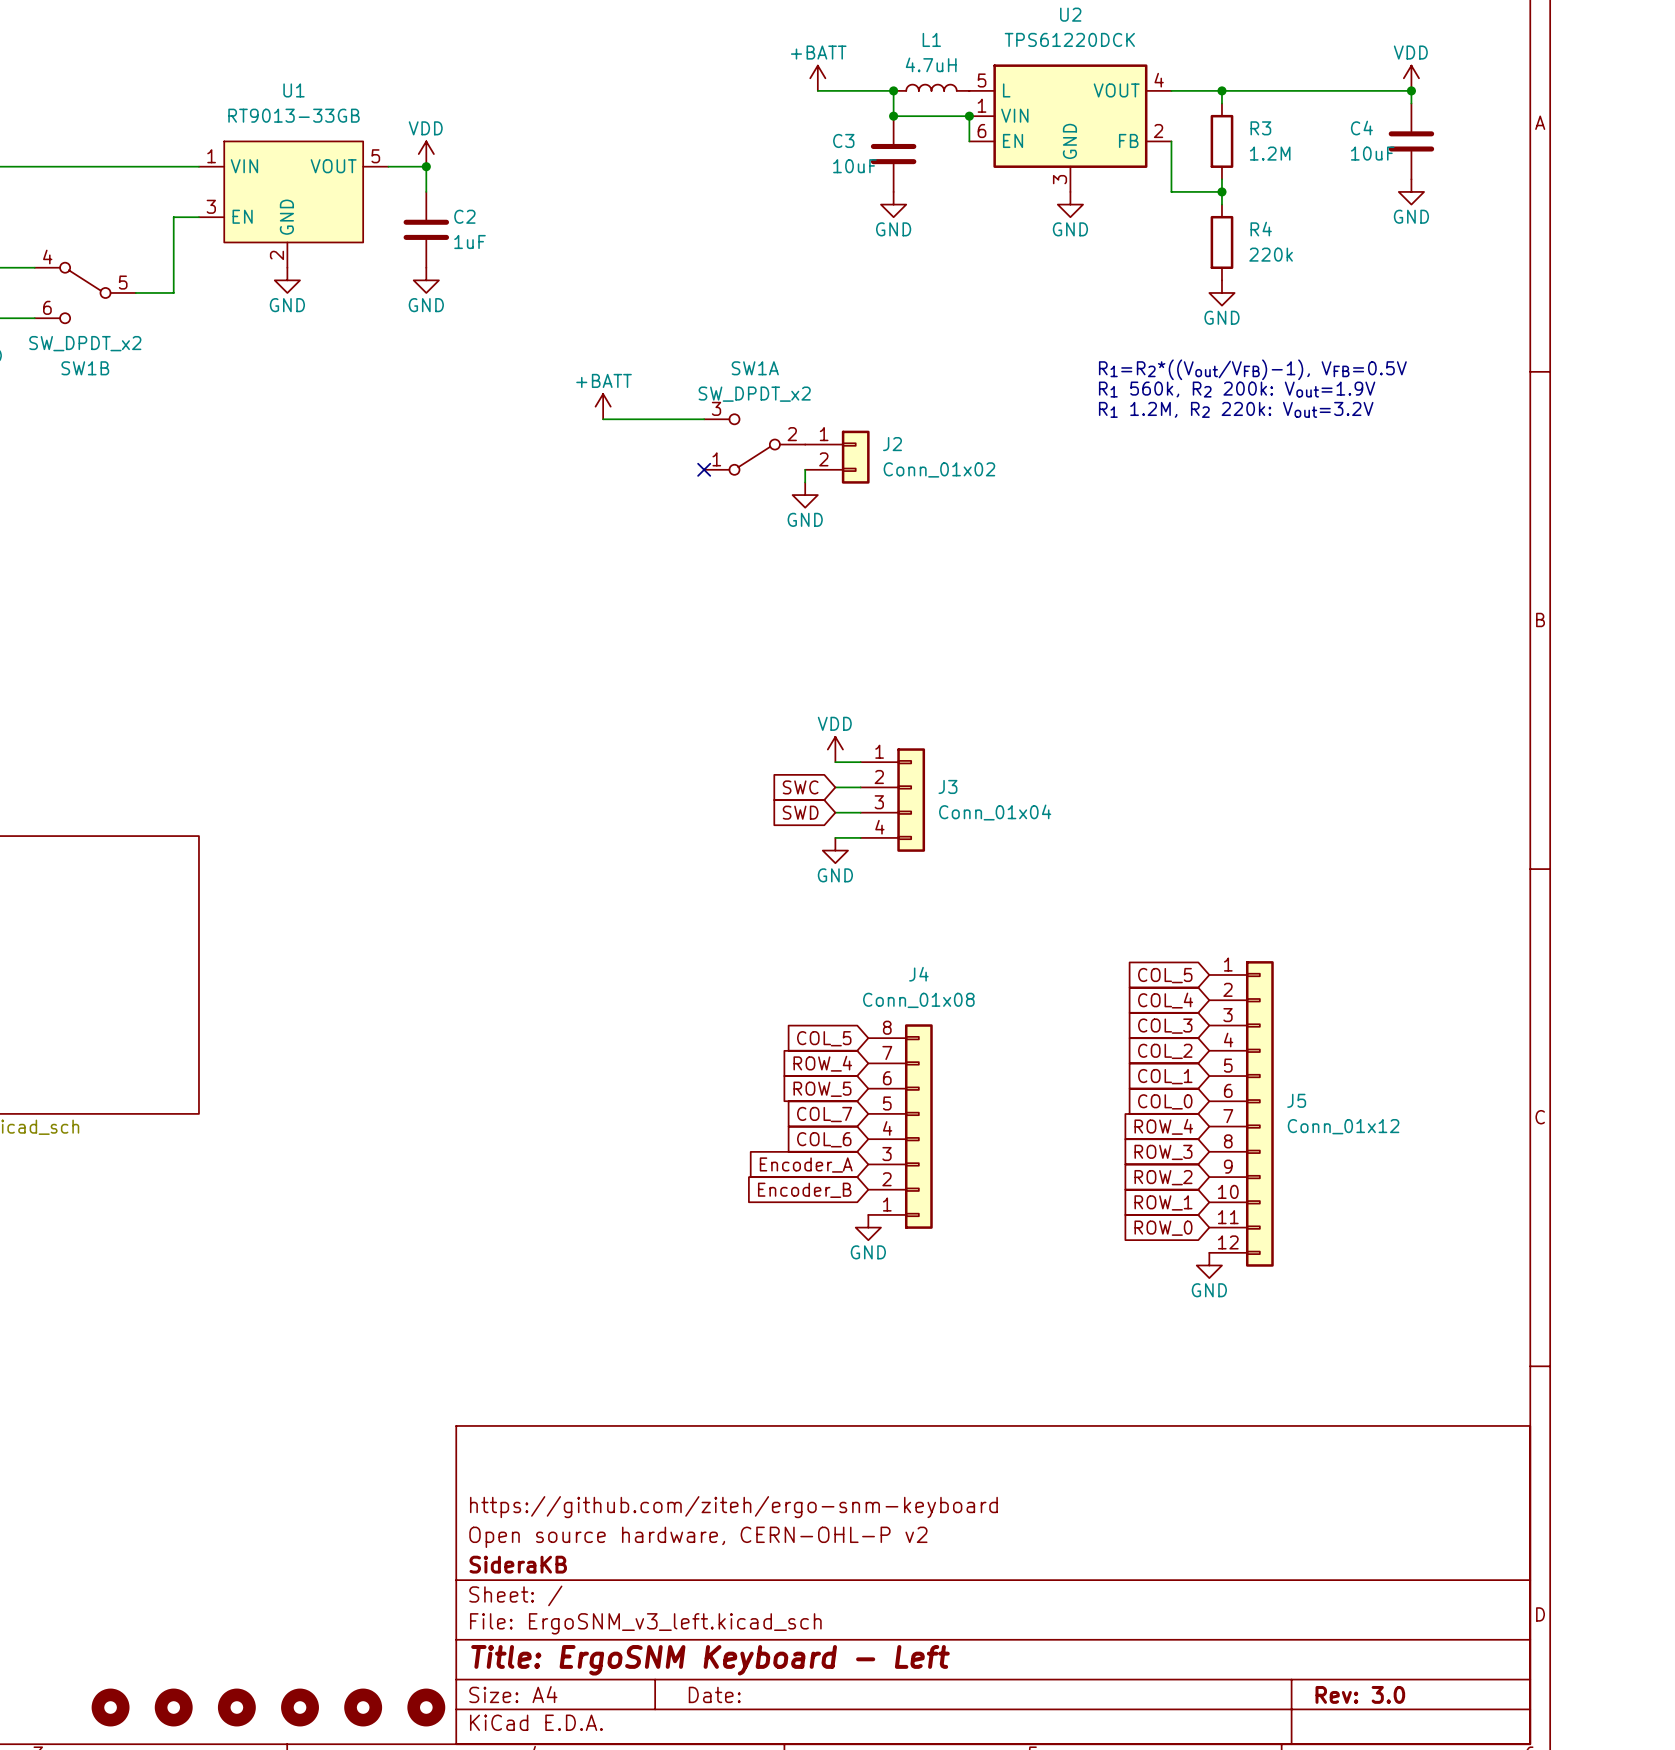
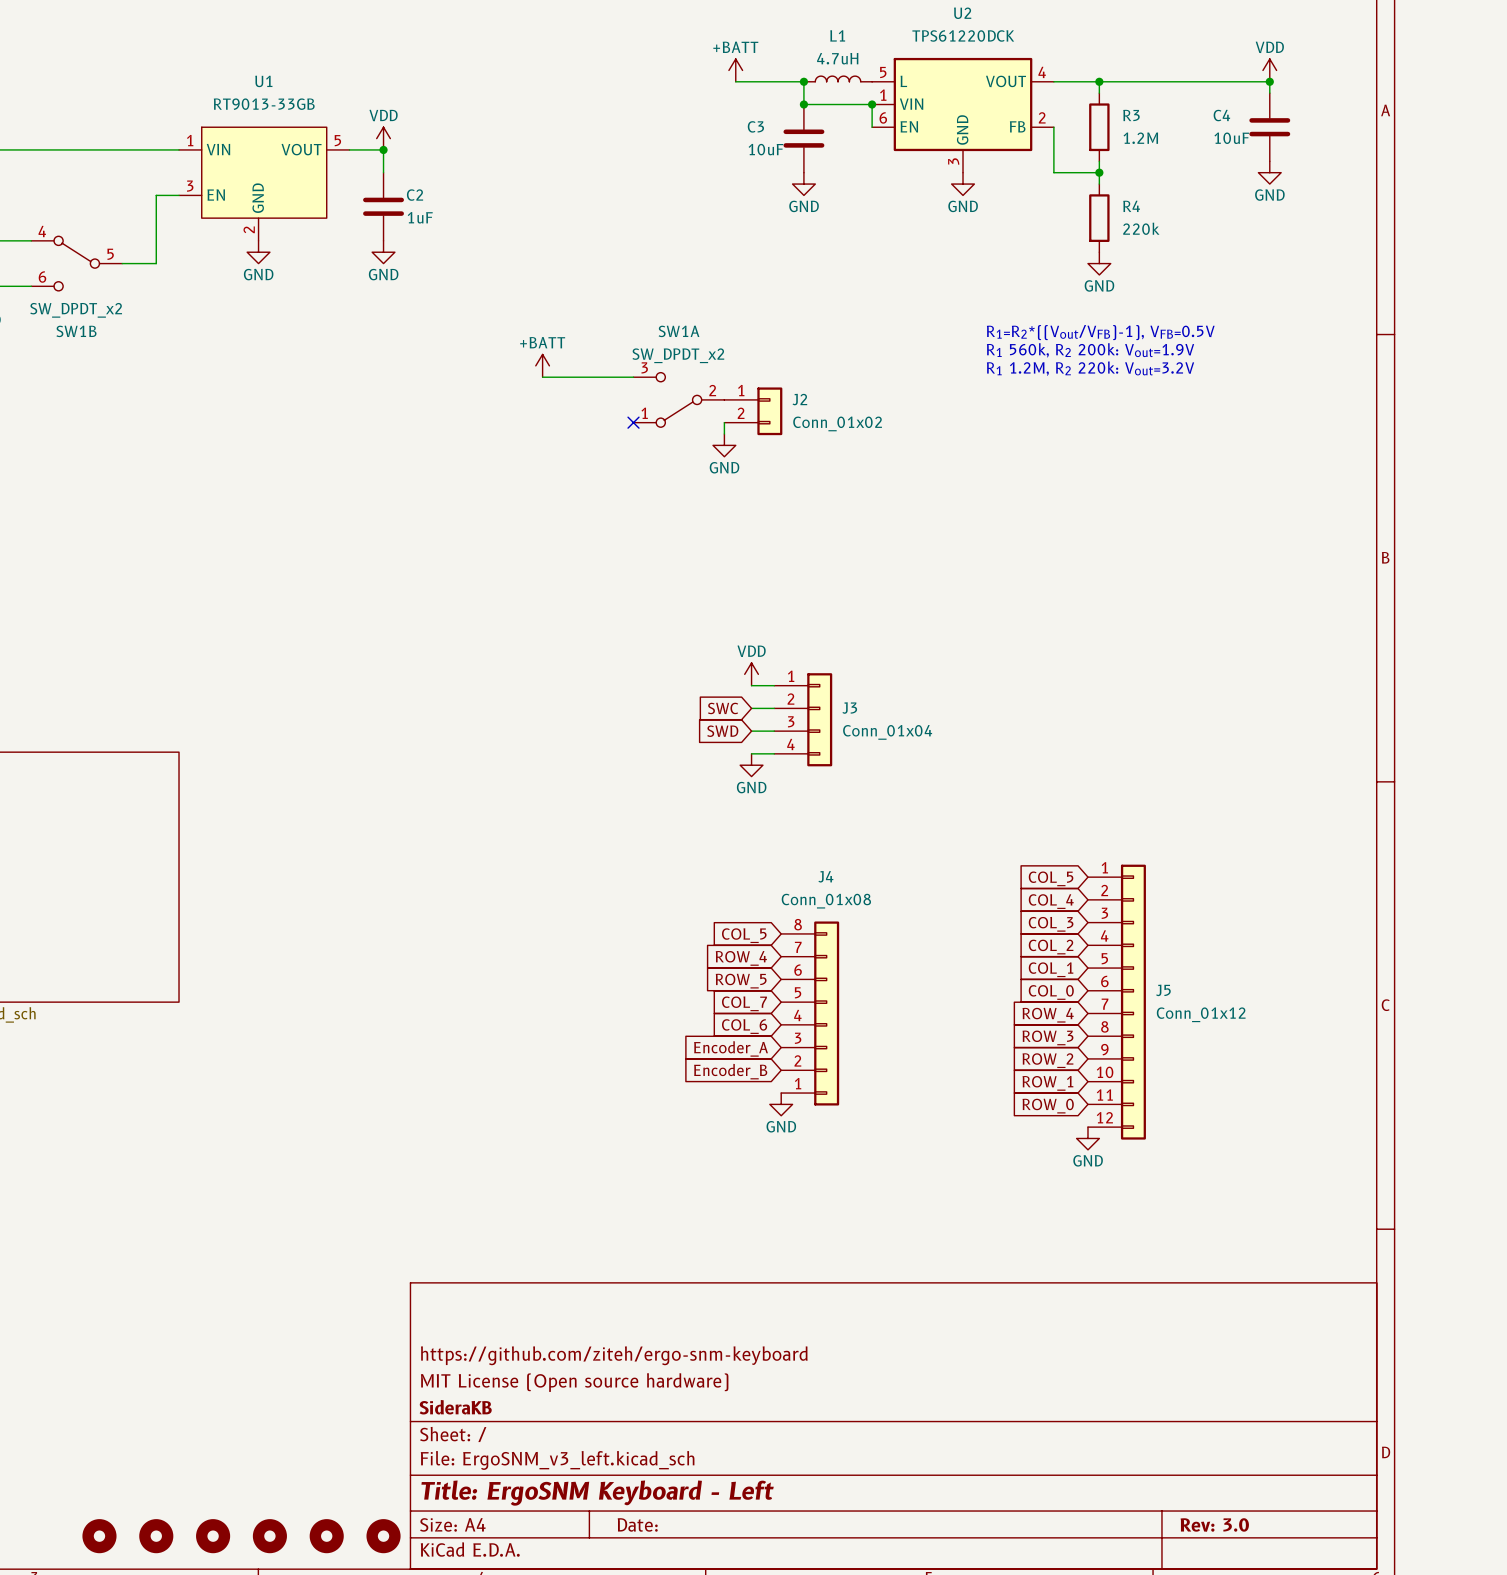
title block: Open source hardware, CERN-OHL-P v2 (698, 1537) -> MIT License (Open source hardware) (574, 1382)

